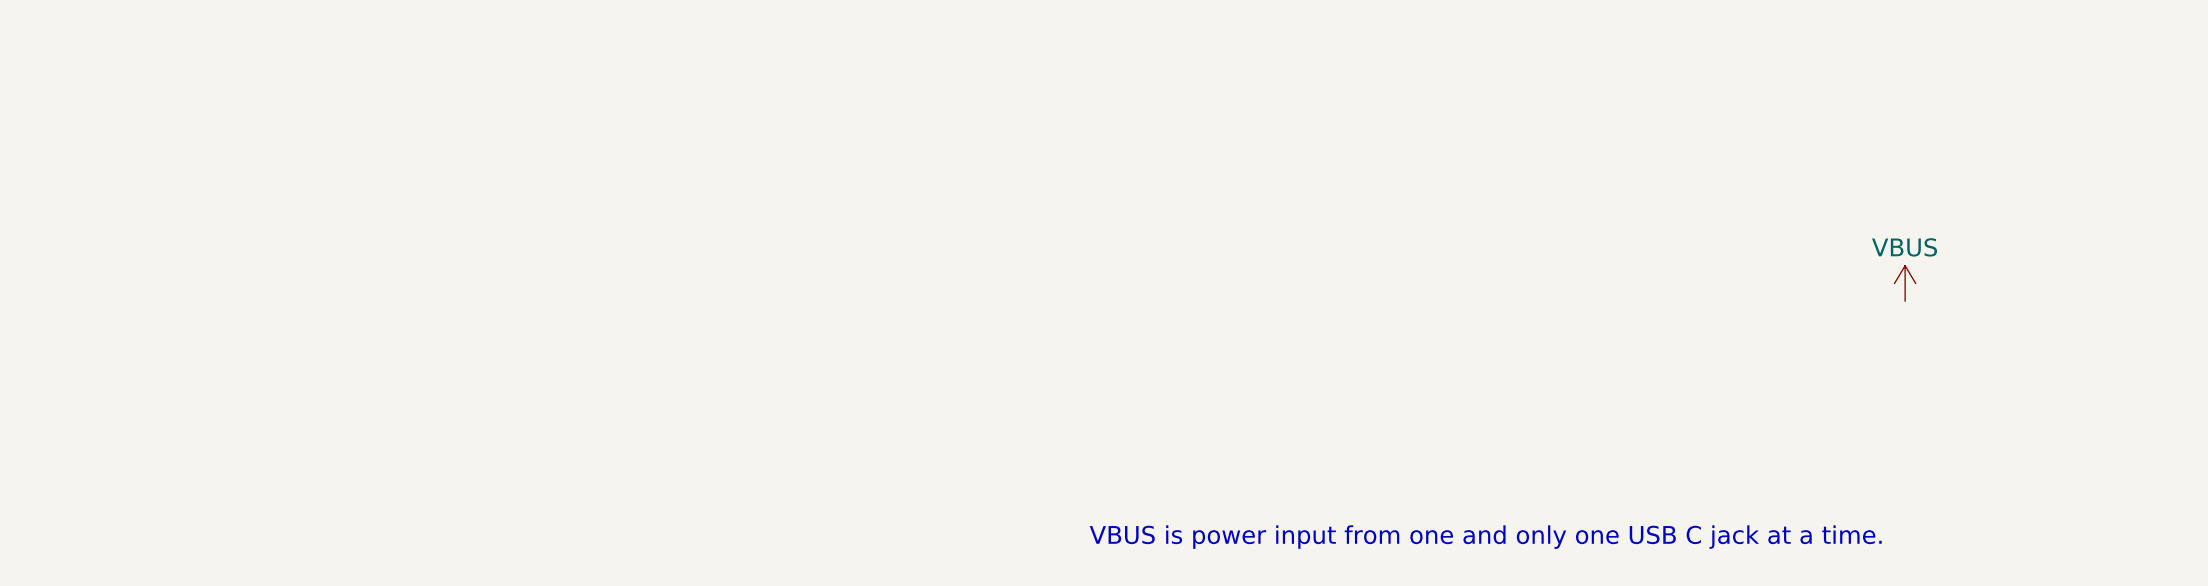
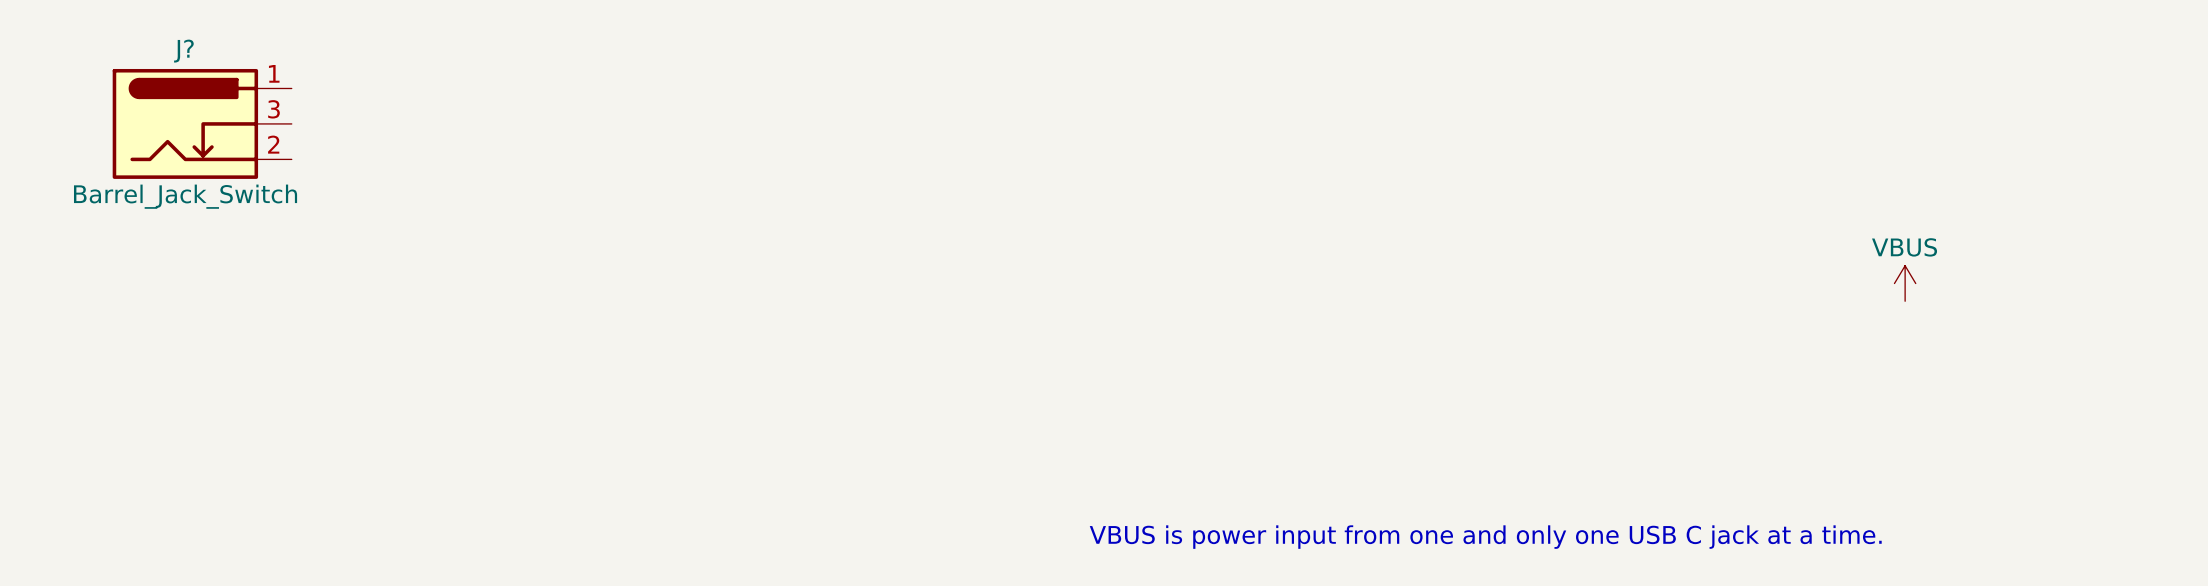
J?: none -> Barrel_Jack_Switch (202, 123)

